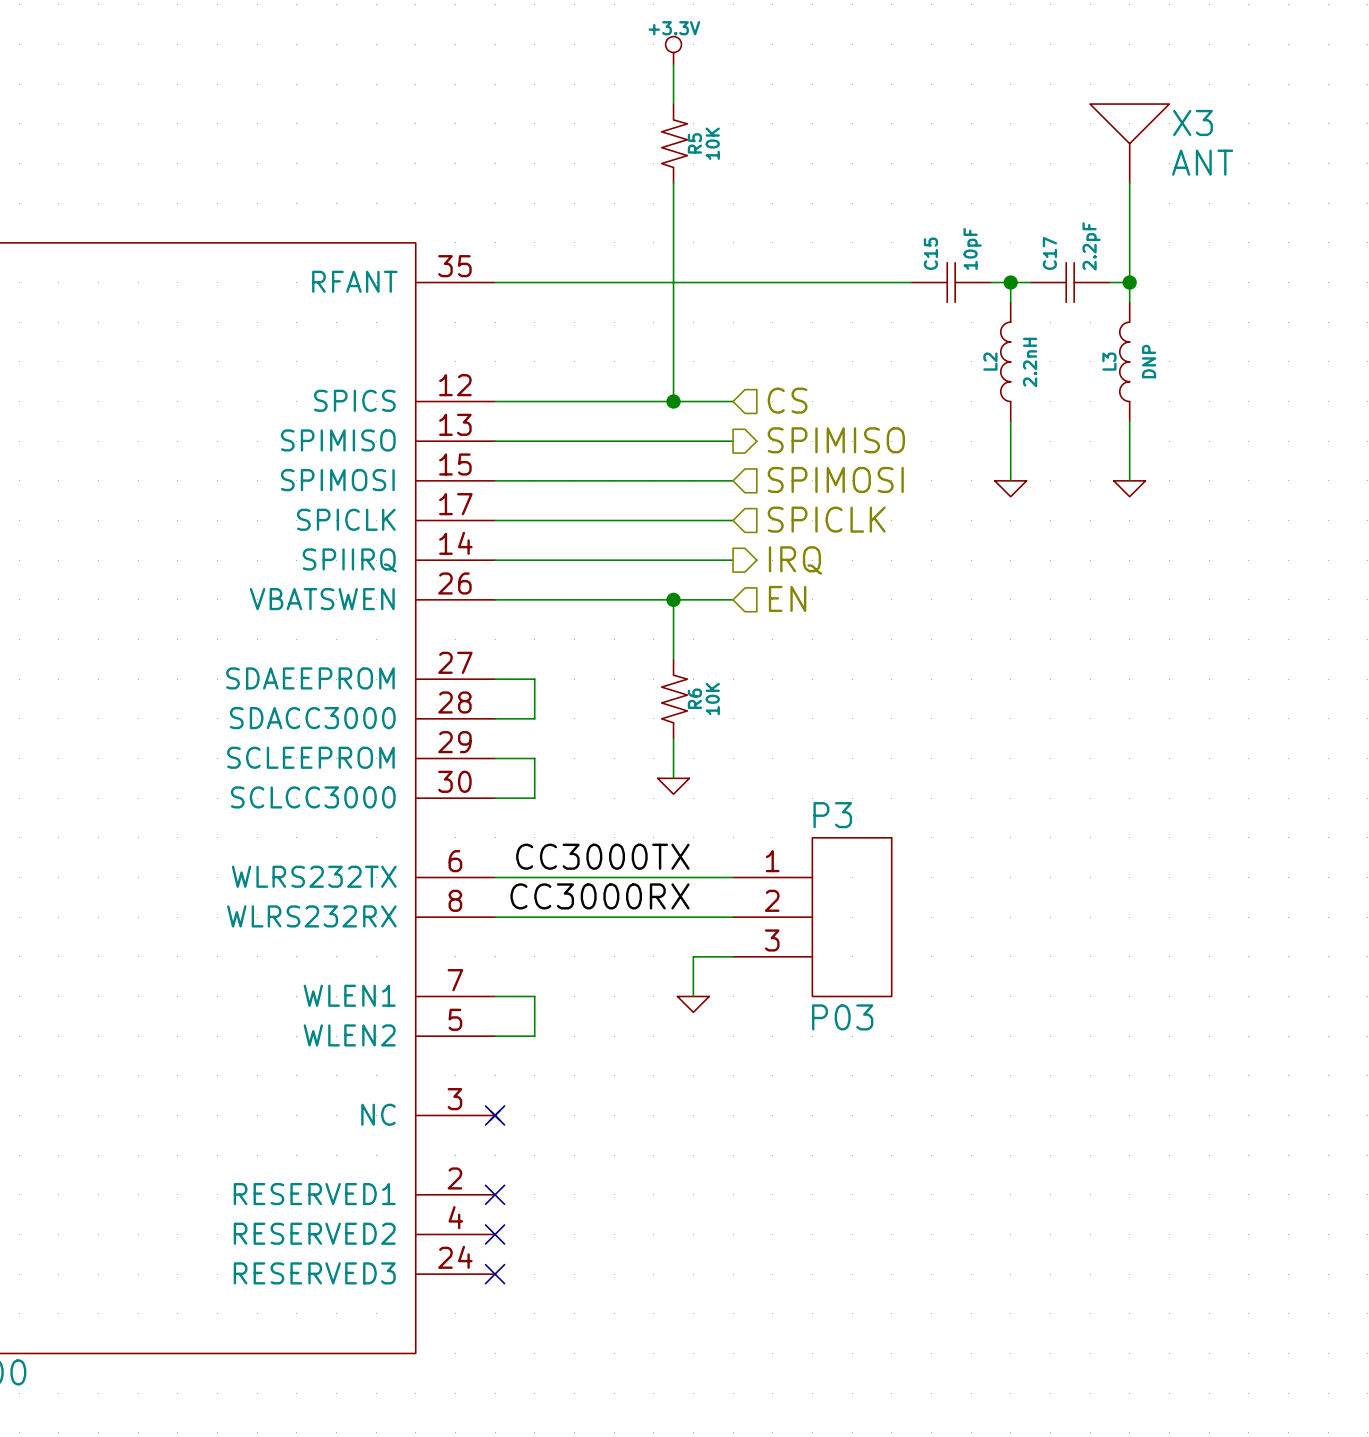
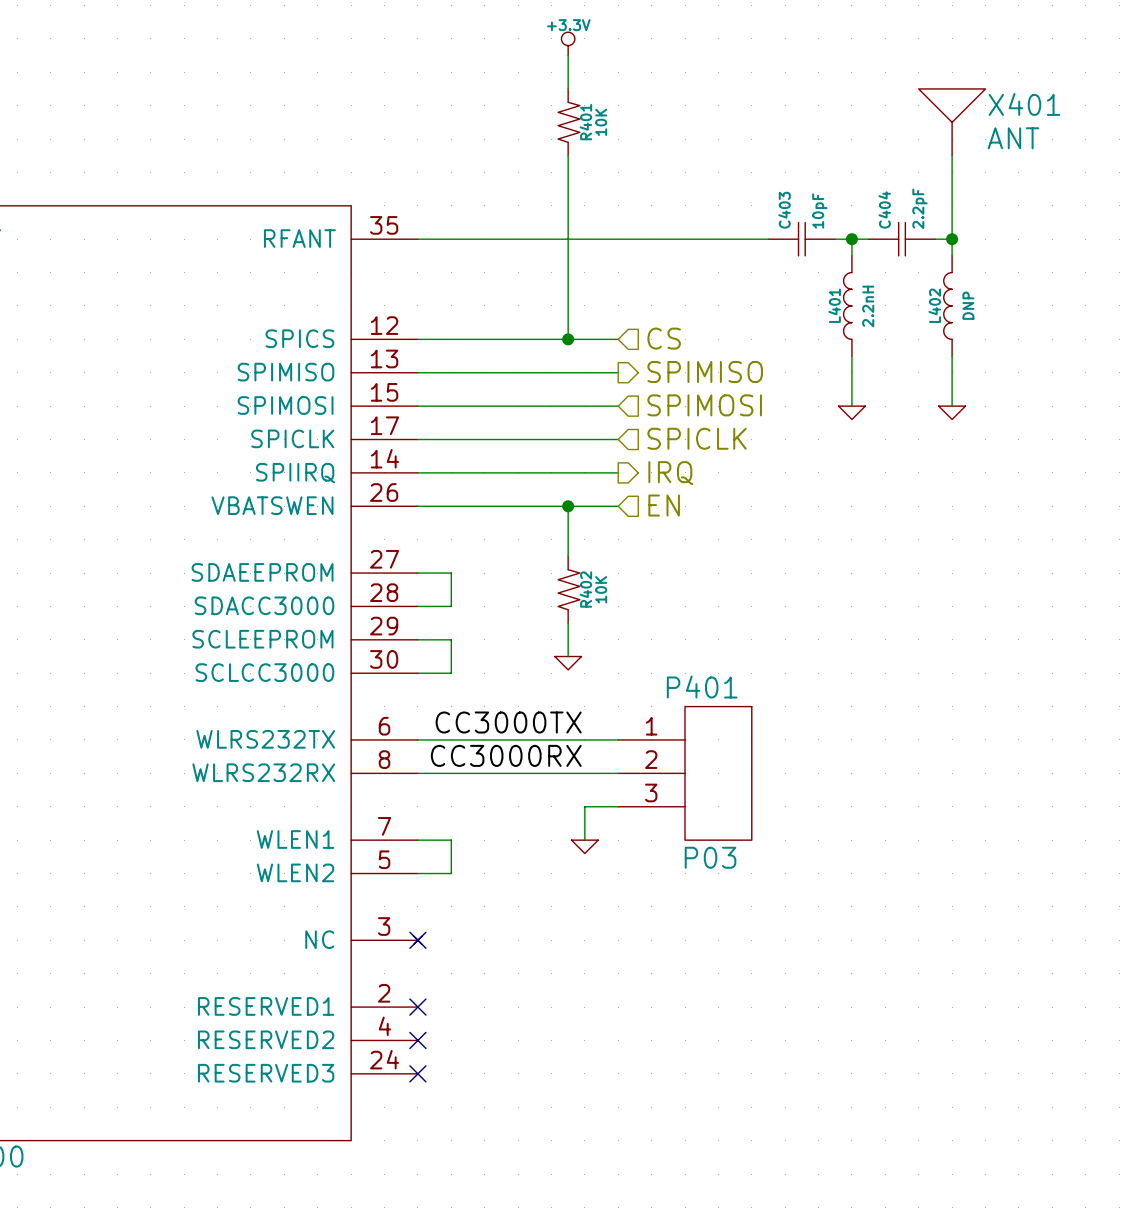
X3 name: X3 (1193, 122) -> X401 (1024, 104)
R5 name: R5 (694, 143) -> R401 (585, 122)
C15 name: C15 (930, 253) -> C403 (784, 210)
C17 name: C17 (1049, 253) -> C404 (884, 209)
L2 name: L2 (990, 361) -> L401 (834, 305)
L3 name: L3 (1109, 361) -> L402 (934, 305)
R6 name: R6 (694, 698) -> R402 (585, 589)
P3 name: P3 (832, 815) -> P401 (702, 687)

